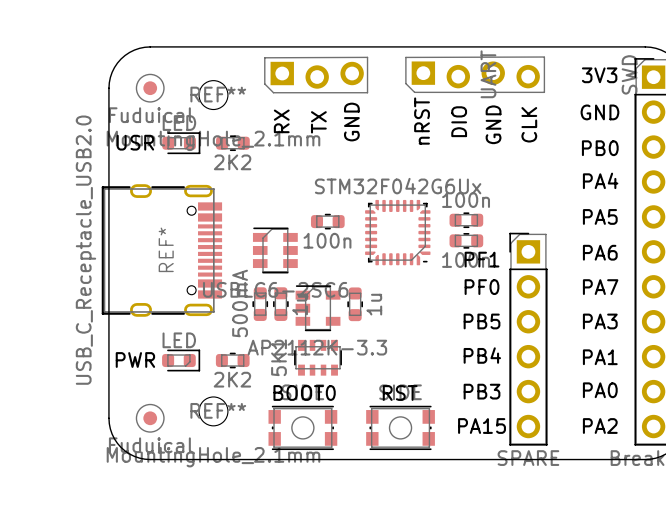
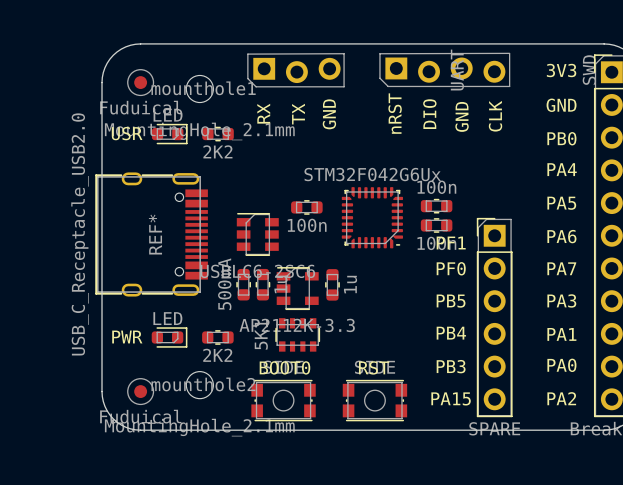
REF** name: REF** (218, 94) -> mounthole1 (203, 88)
REF** name: REF** (218, 410) -> mounthole2 (203, 384)

